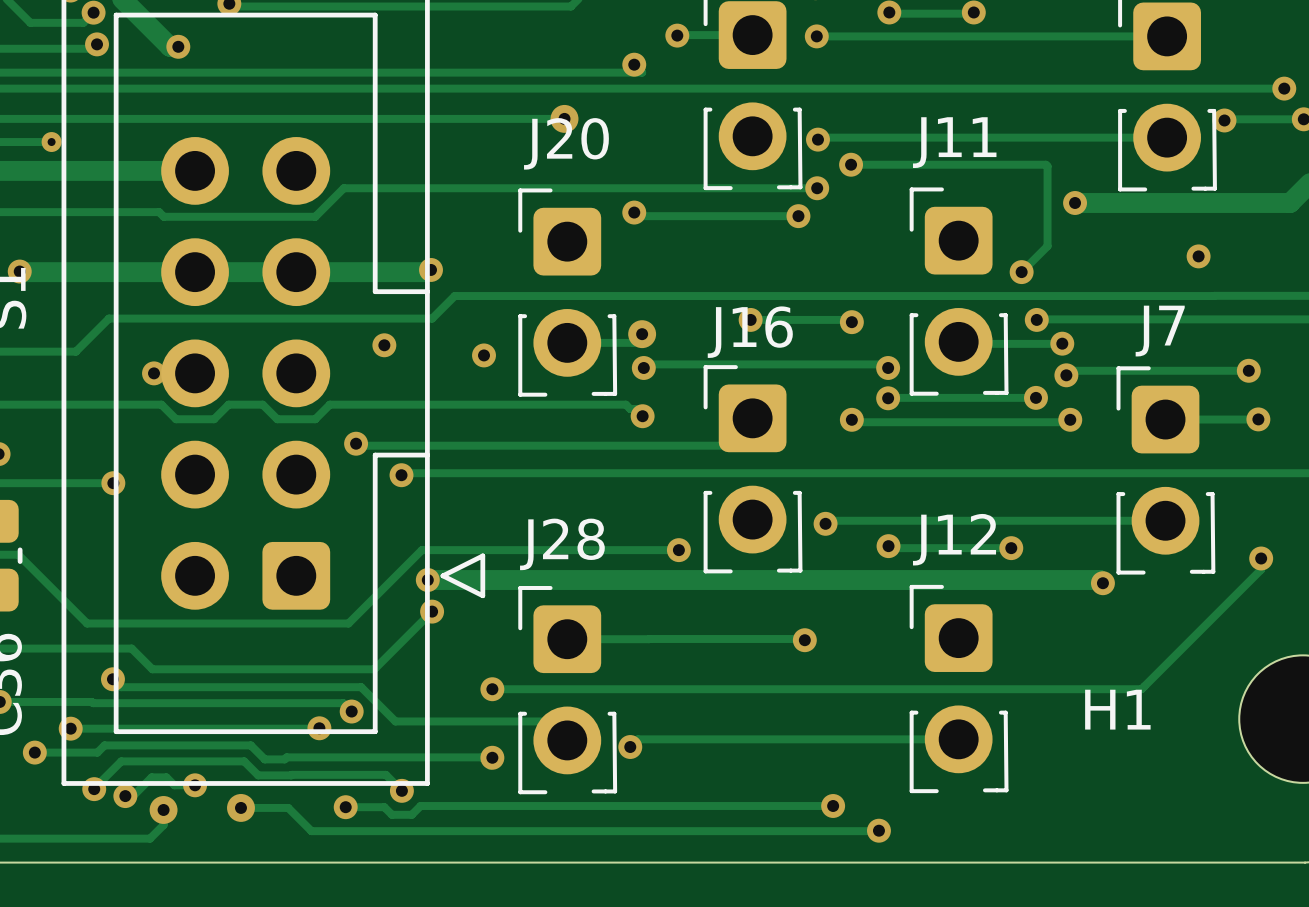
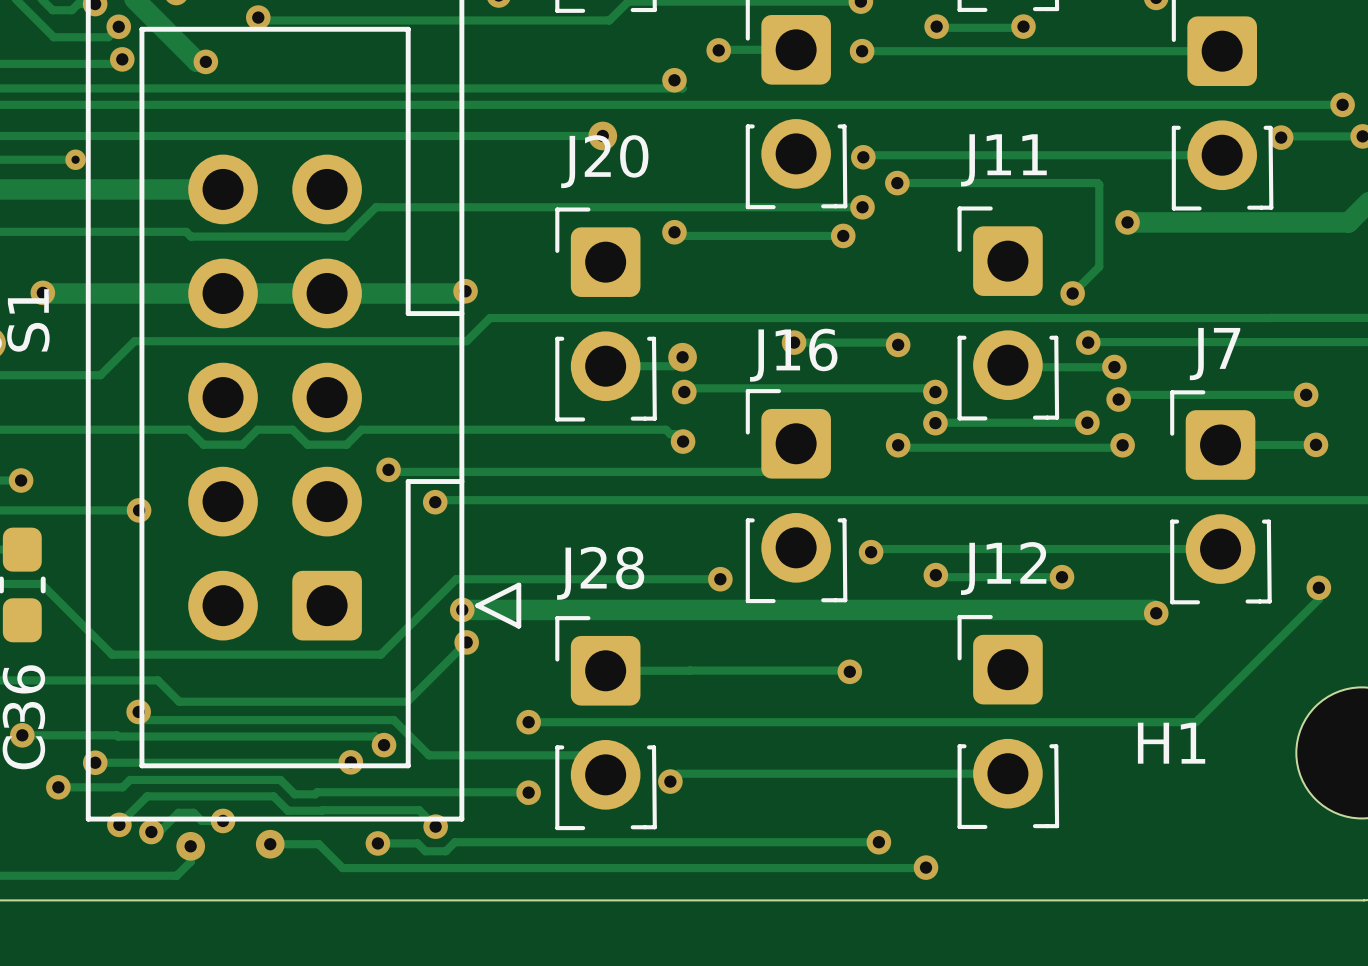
via: (1198, 256) -> none
via: (384, 345) -> none
via: (484, 355) -> none
via: (154, 373) -> none

